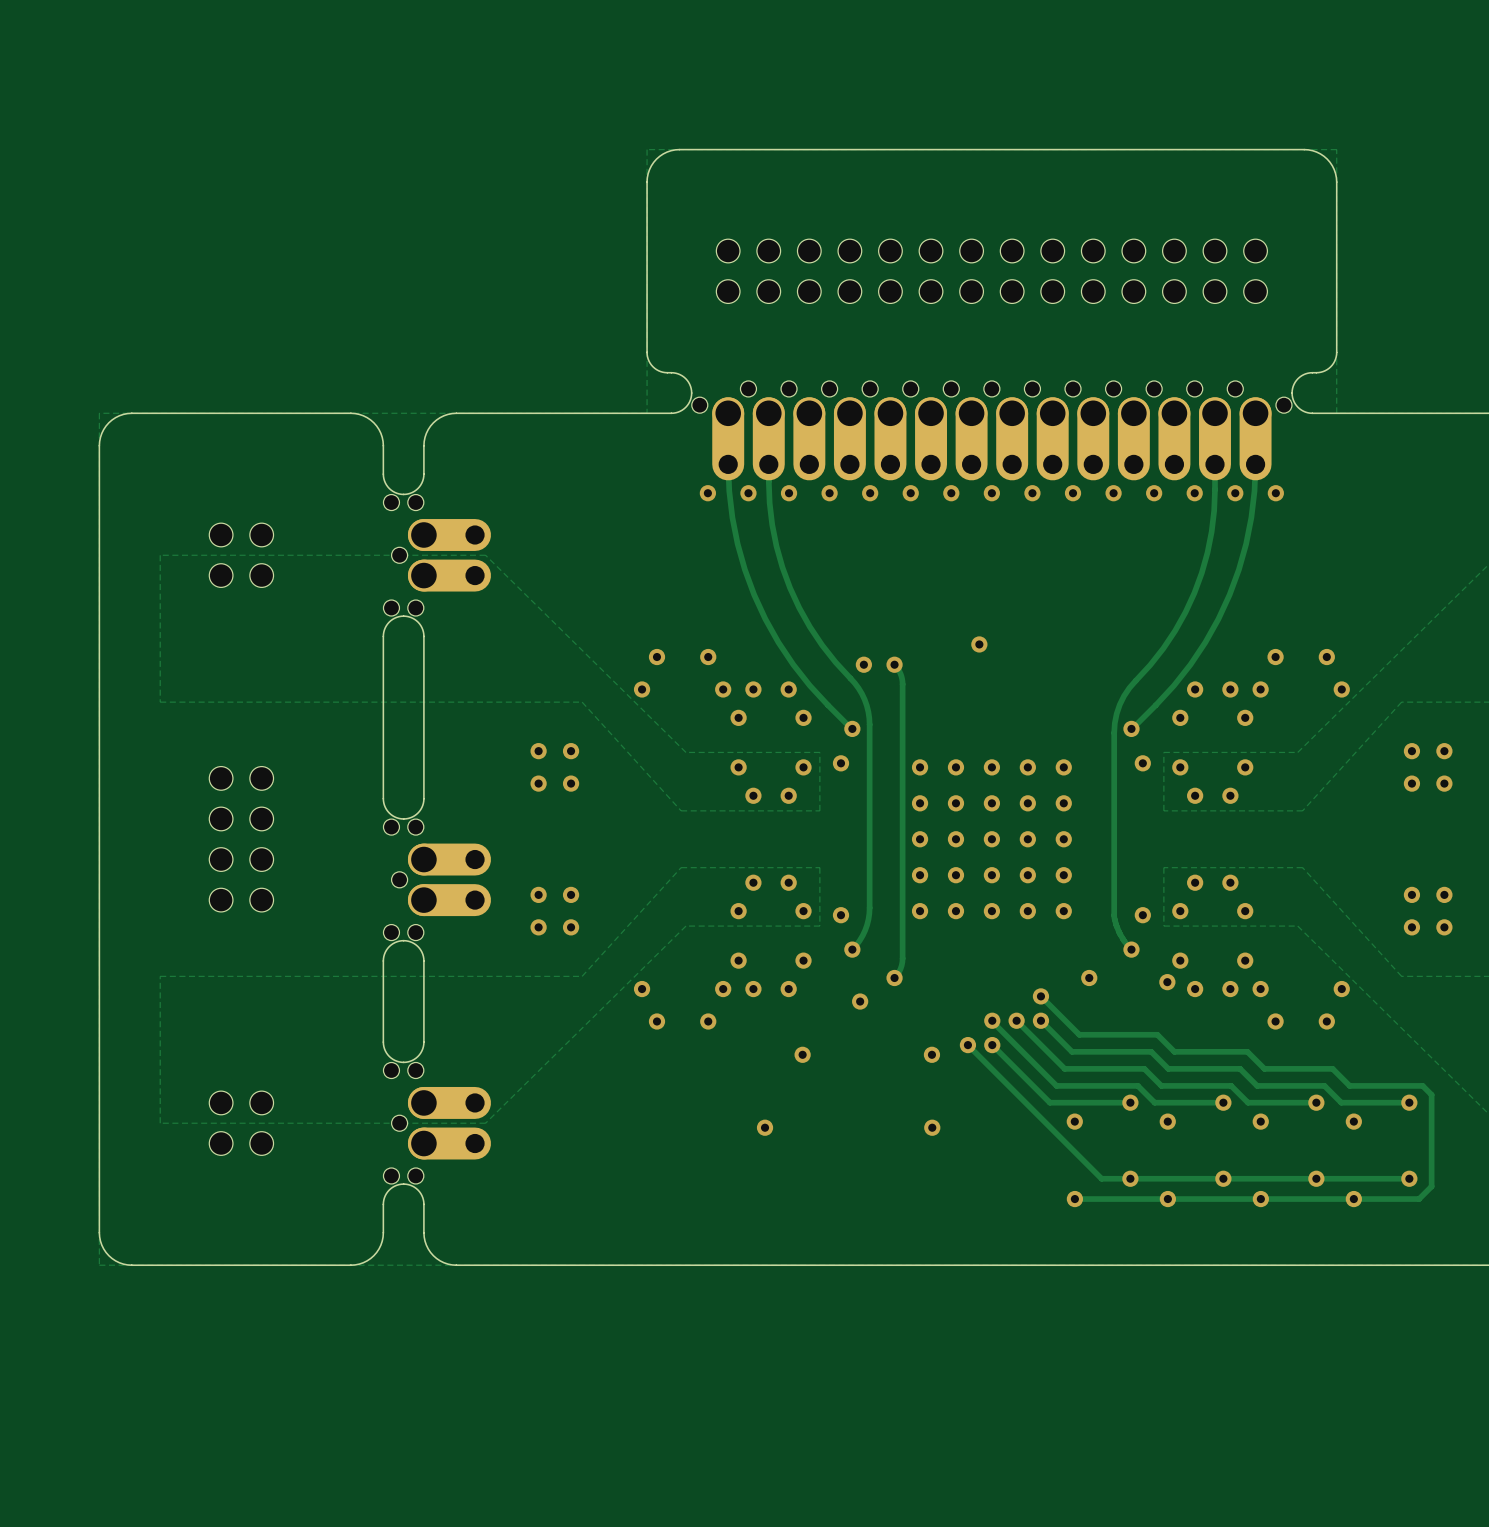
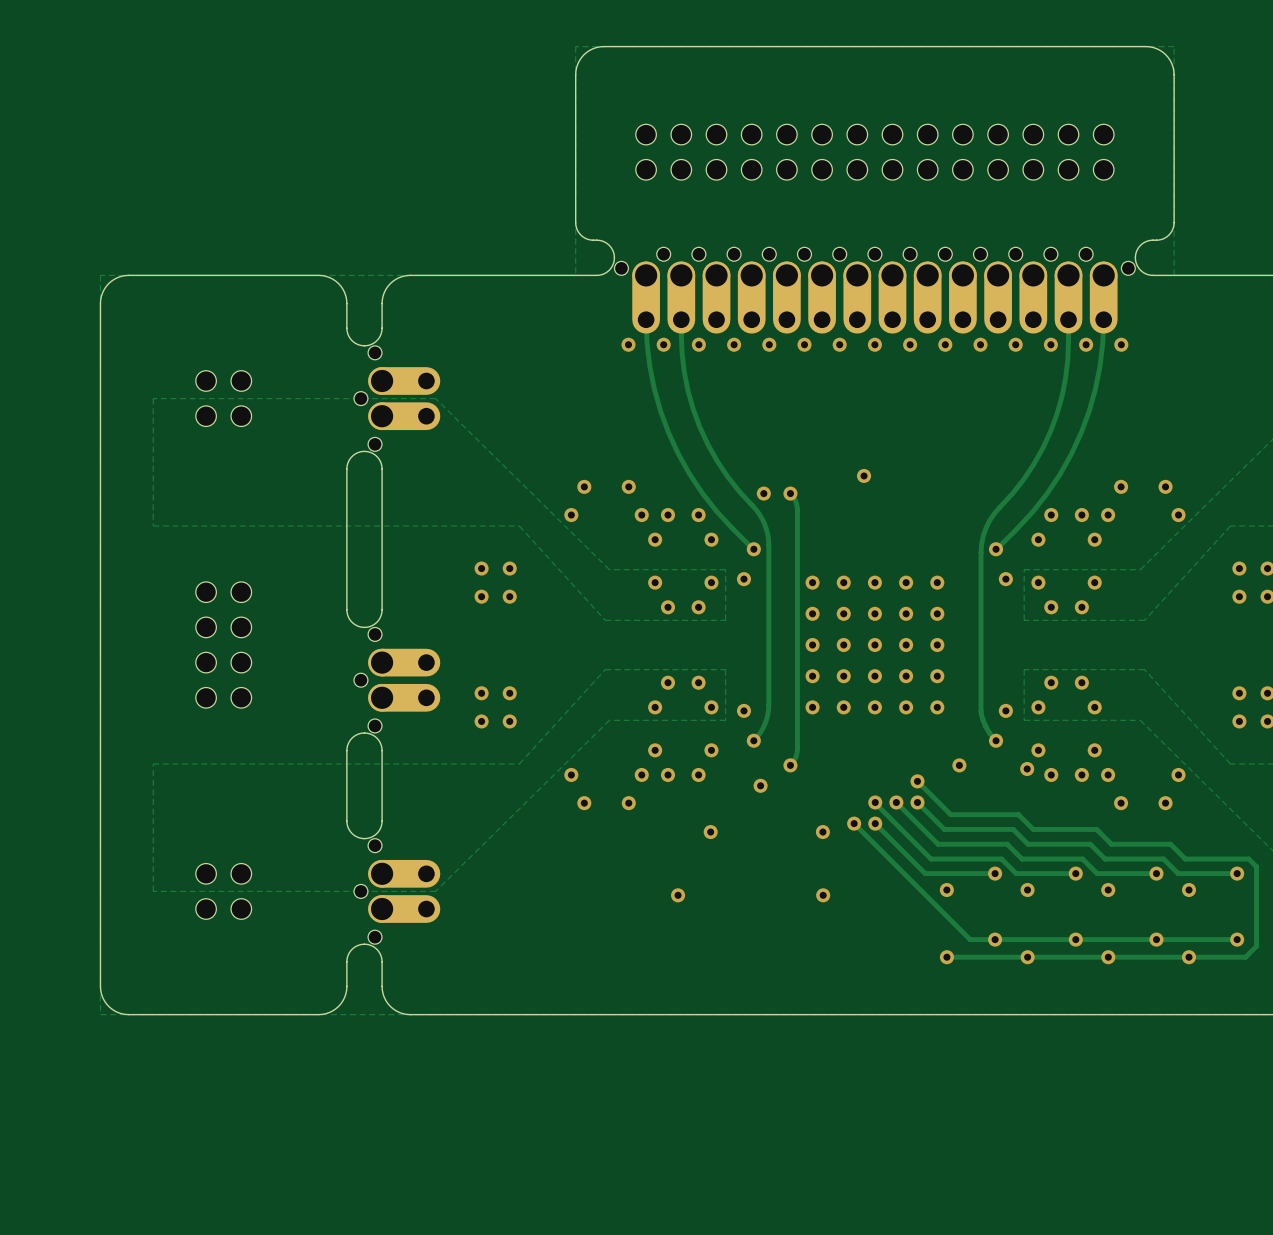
part footprint: [383, 494, 424, 617] -> [354, 345, 382, 452]
part footprint: [383, 819, 424, 941] -> [354, 627, 382, 733]
part footprint: [383, 1062, 424, 1184] -> [354, 838, 382, 945]

